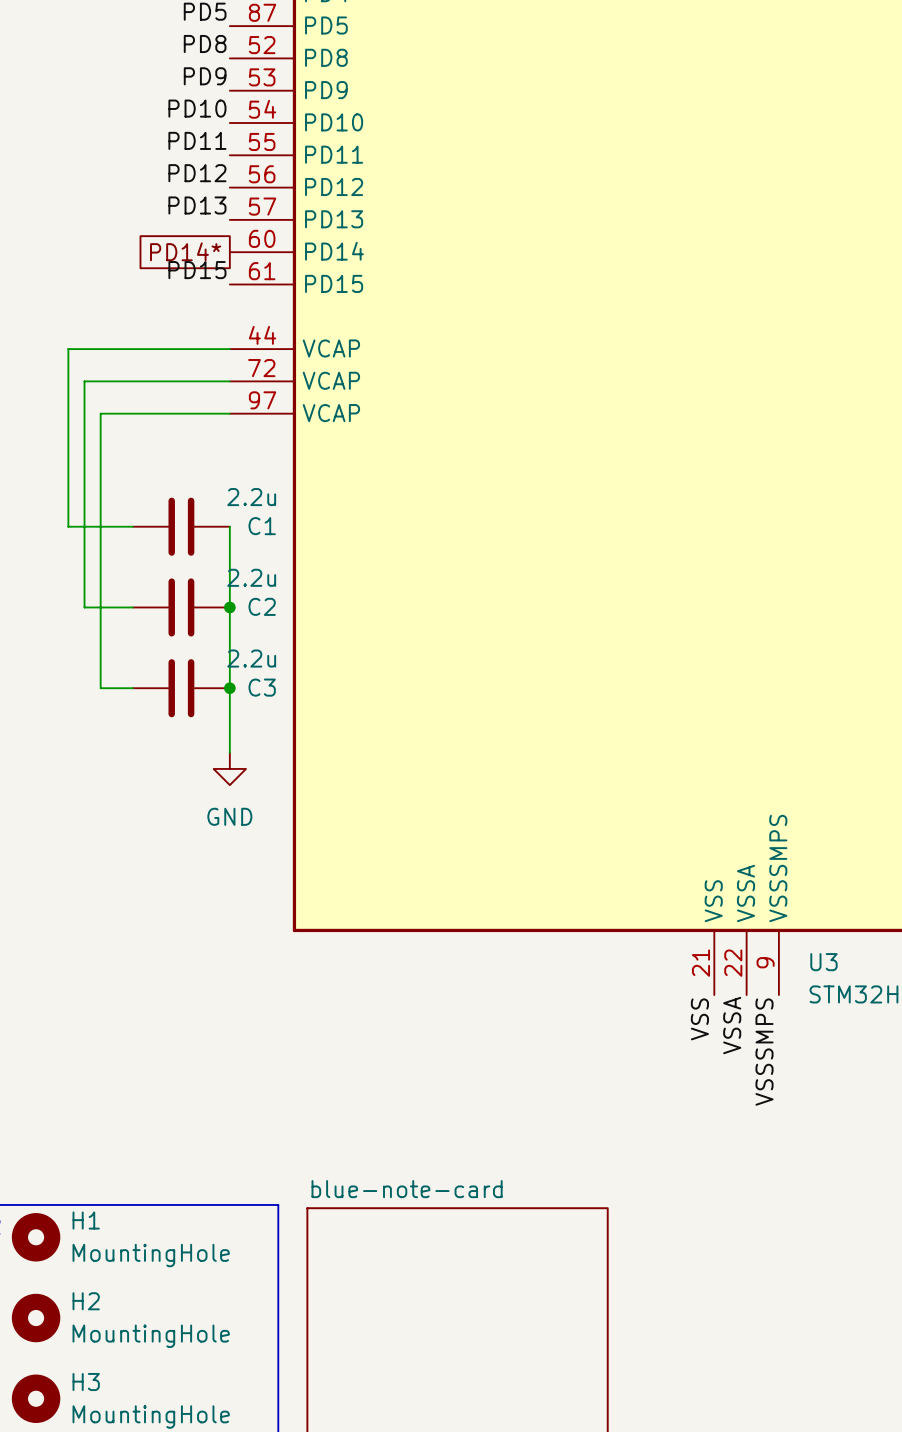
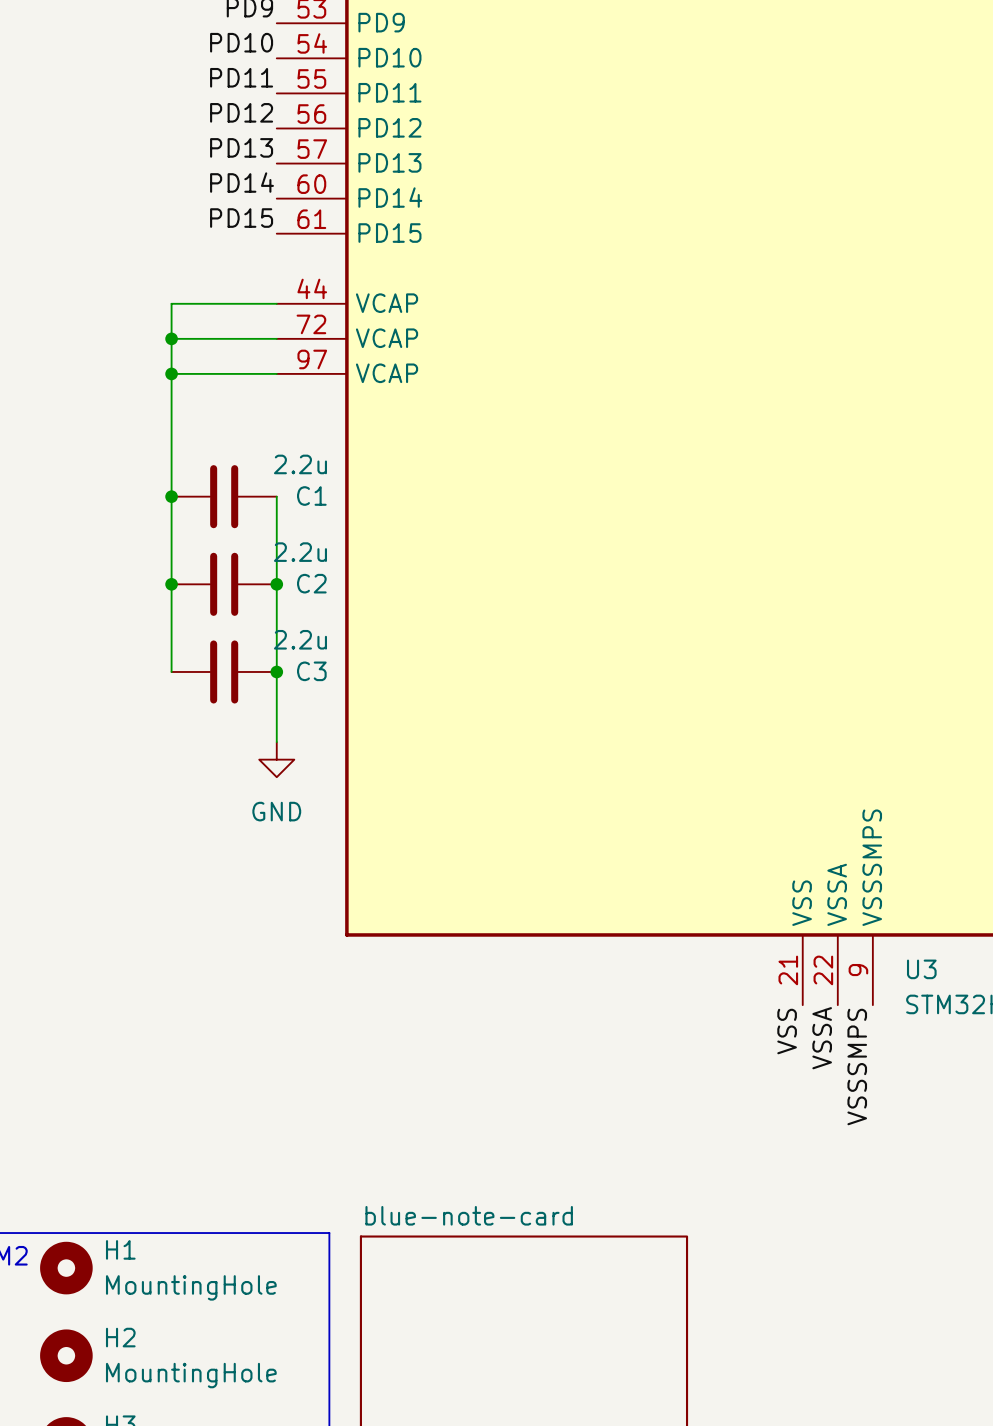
label: none -> PD14 (242, 182)
global label: PD14* (185, 251) -> none
wire: (132, 349) (68, 349) (68, 526) (132, 526) -> none
wire: (132, 381) (84, 381) (84, 607) (132, 607) -> none
junction: none -> (171, 338)
wire: (132, 413) (100, 413) (100, 688) (132, 688) -> (171, 303) (171, 671)
junction: none -> (171, 373)
junction: none -> (171, 496)
junction: none -> (171, 584)

